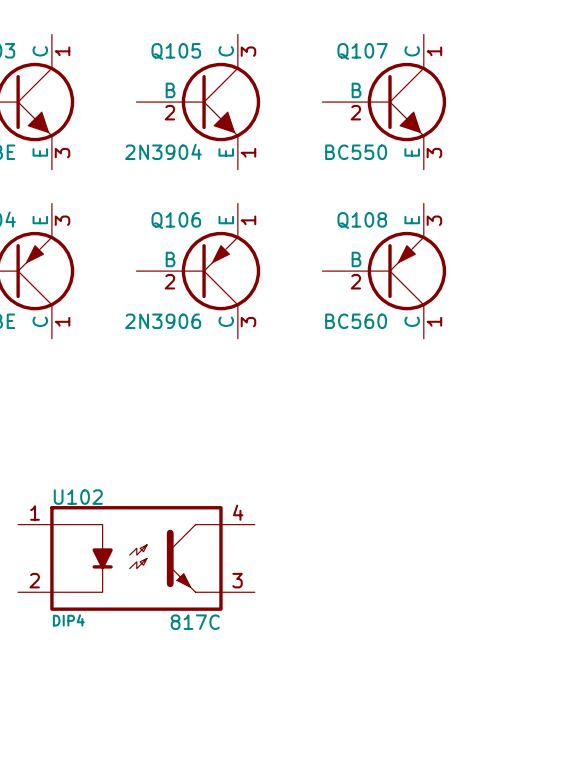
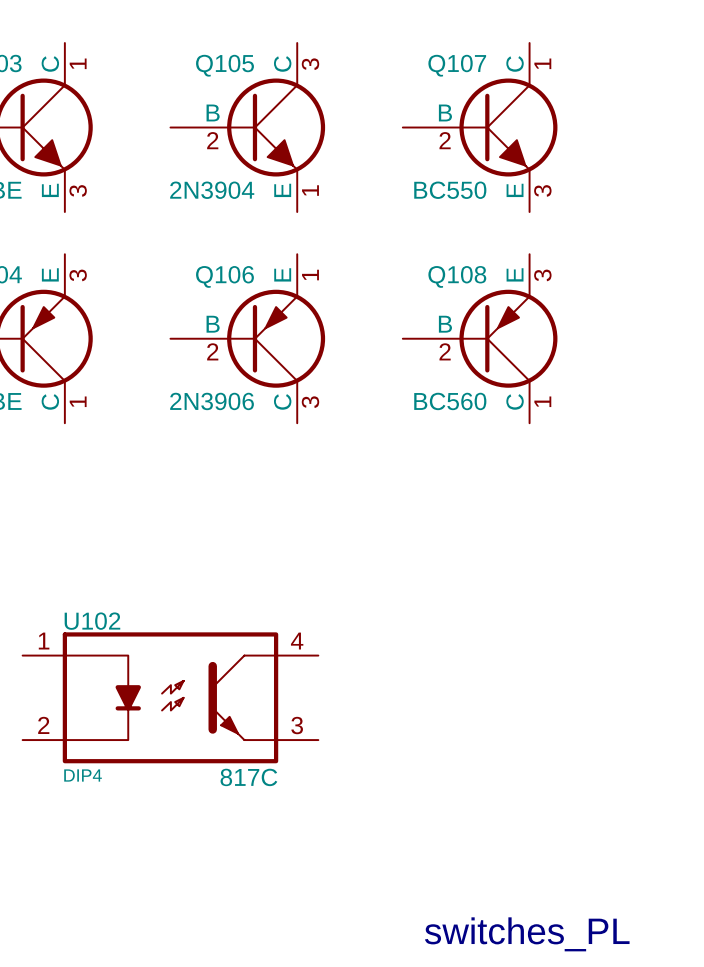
text: none -> switches_PL (527, 934)

